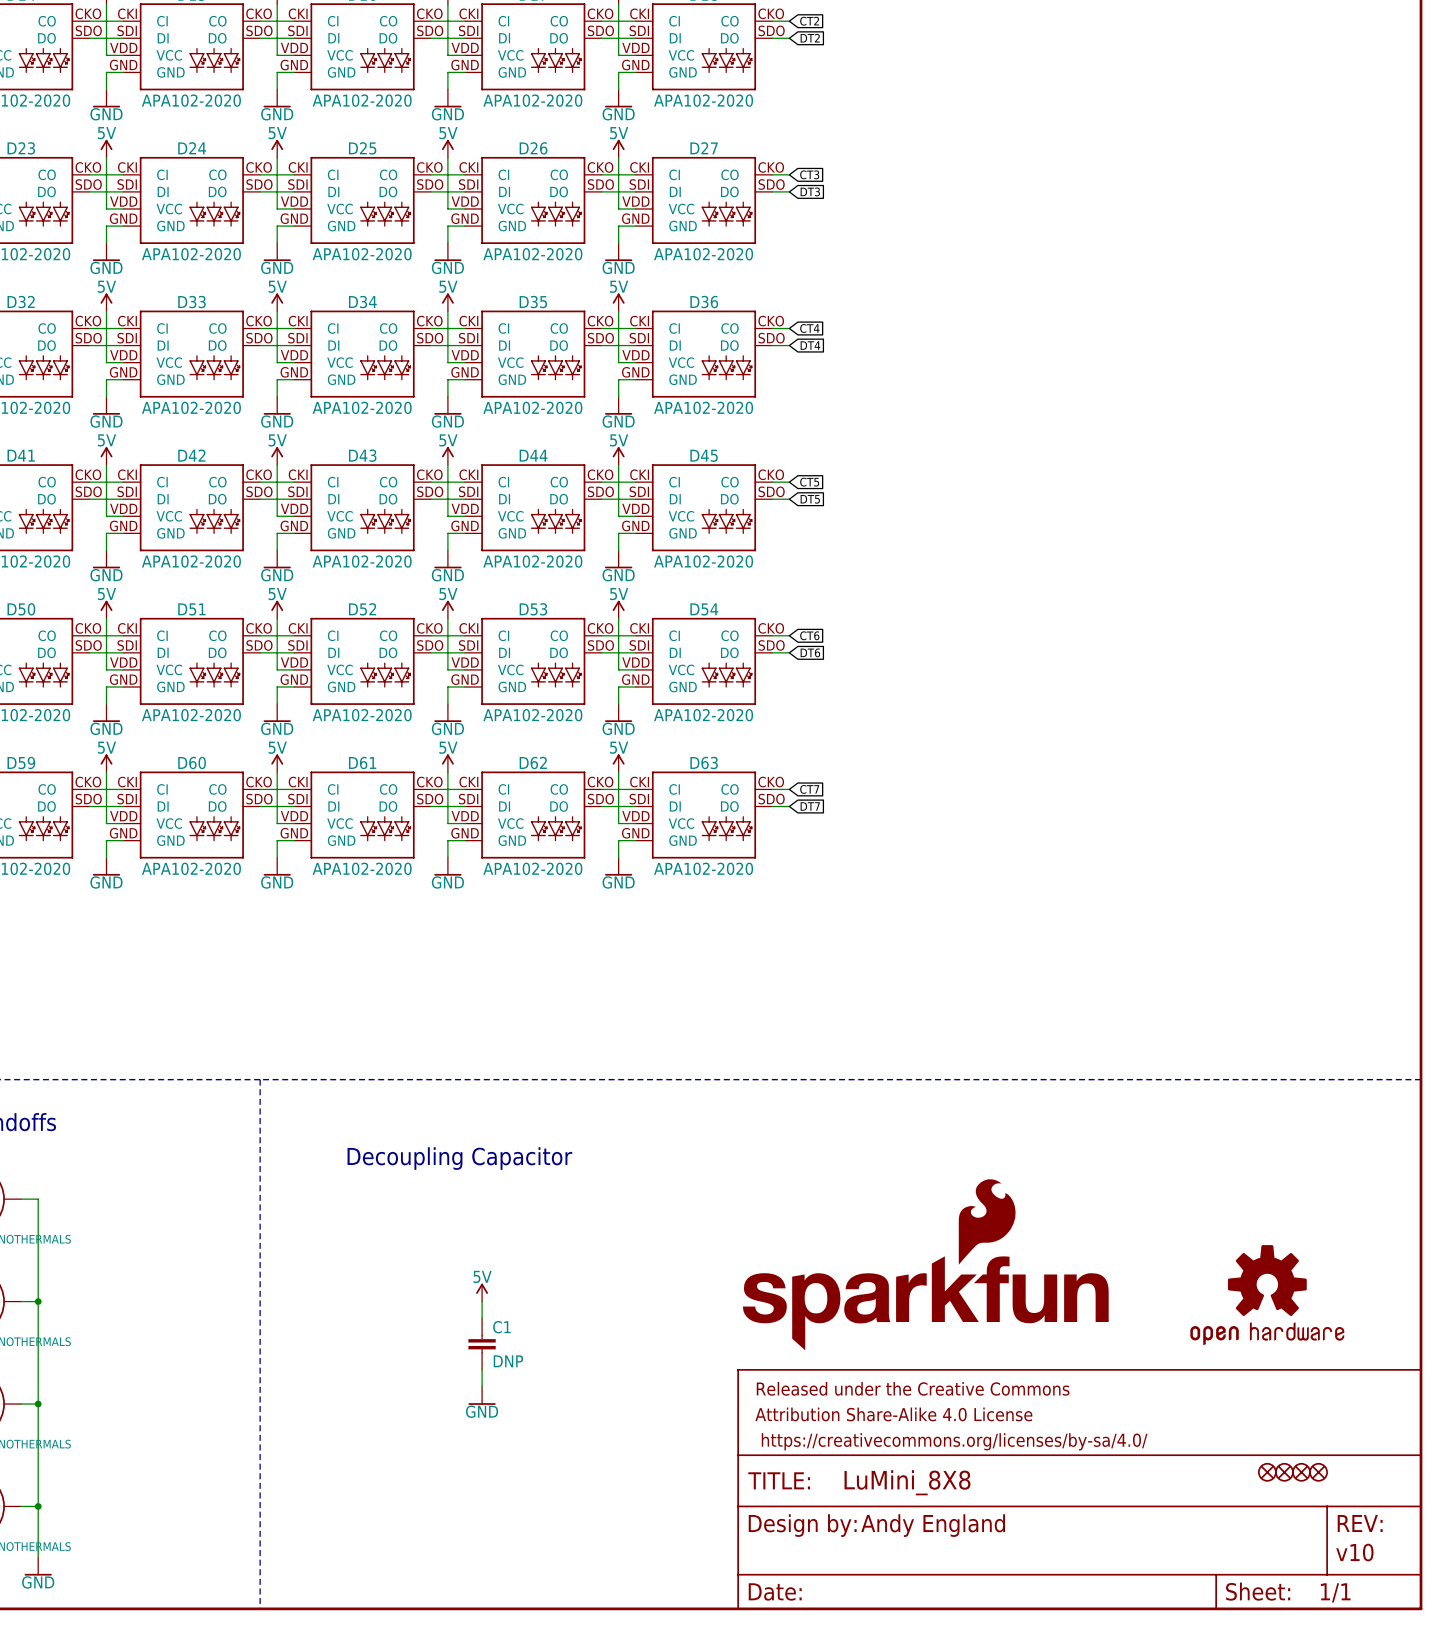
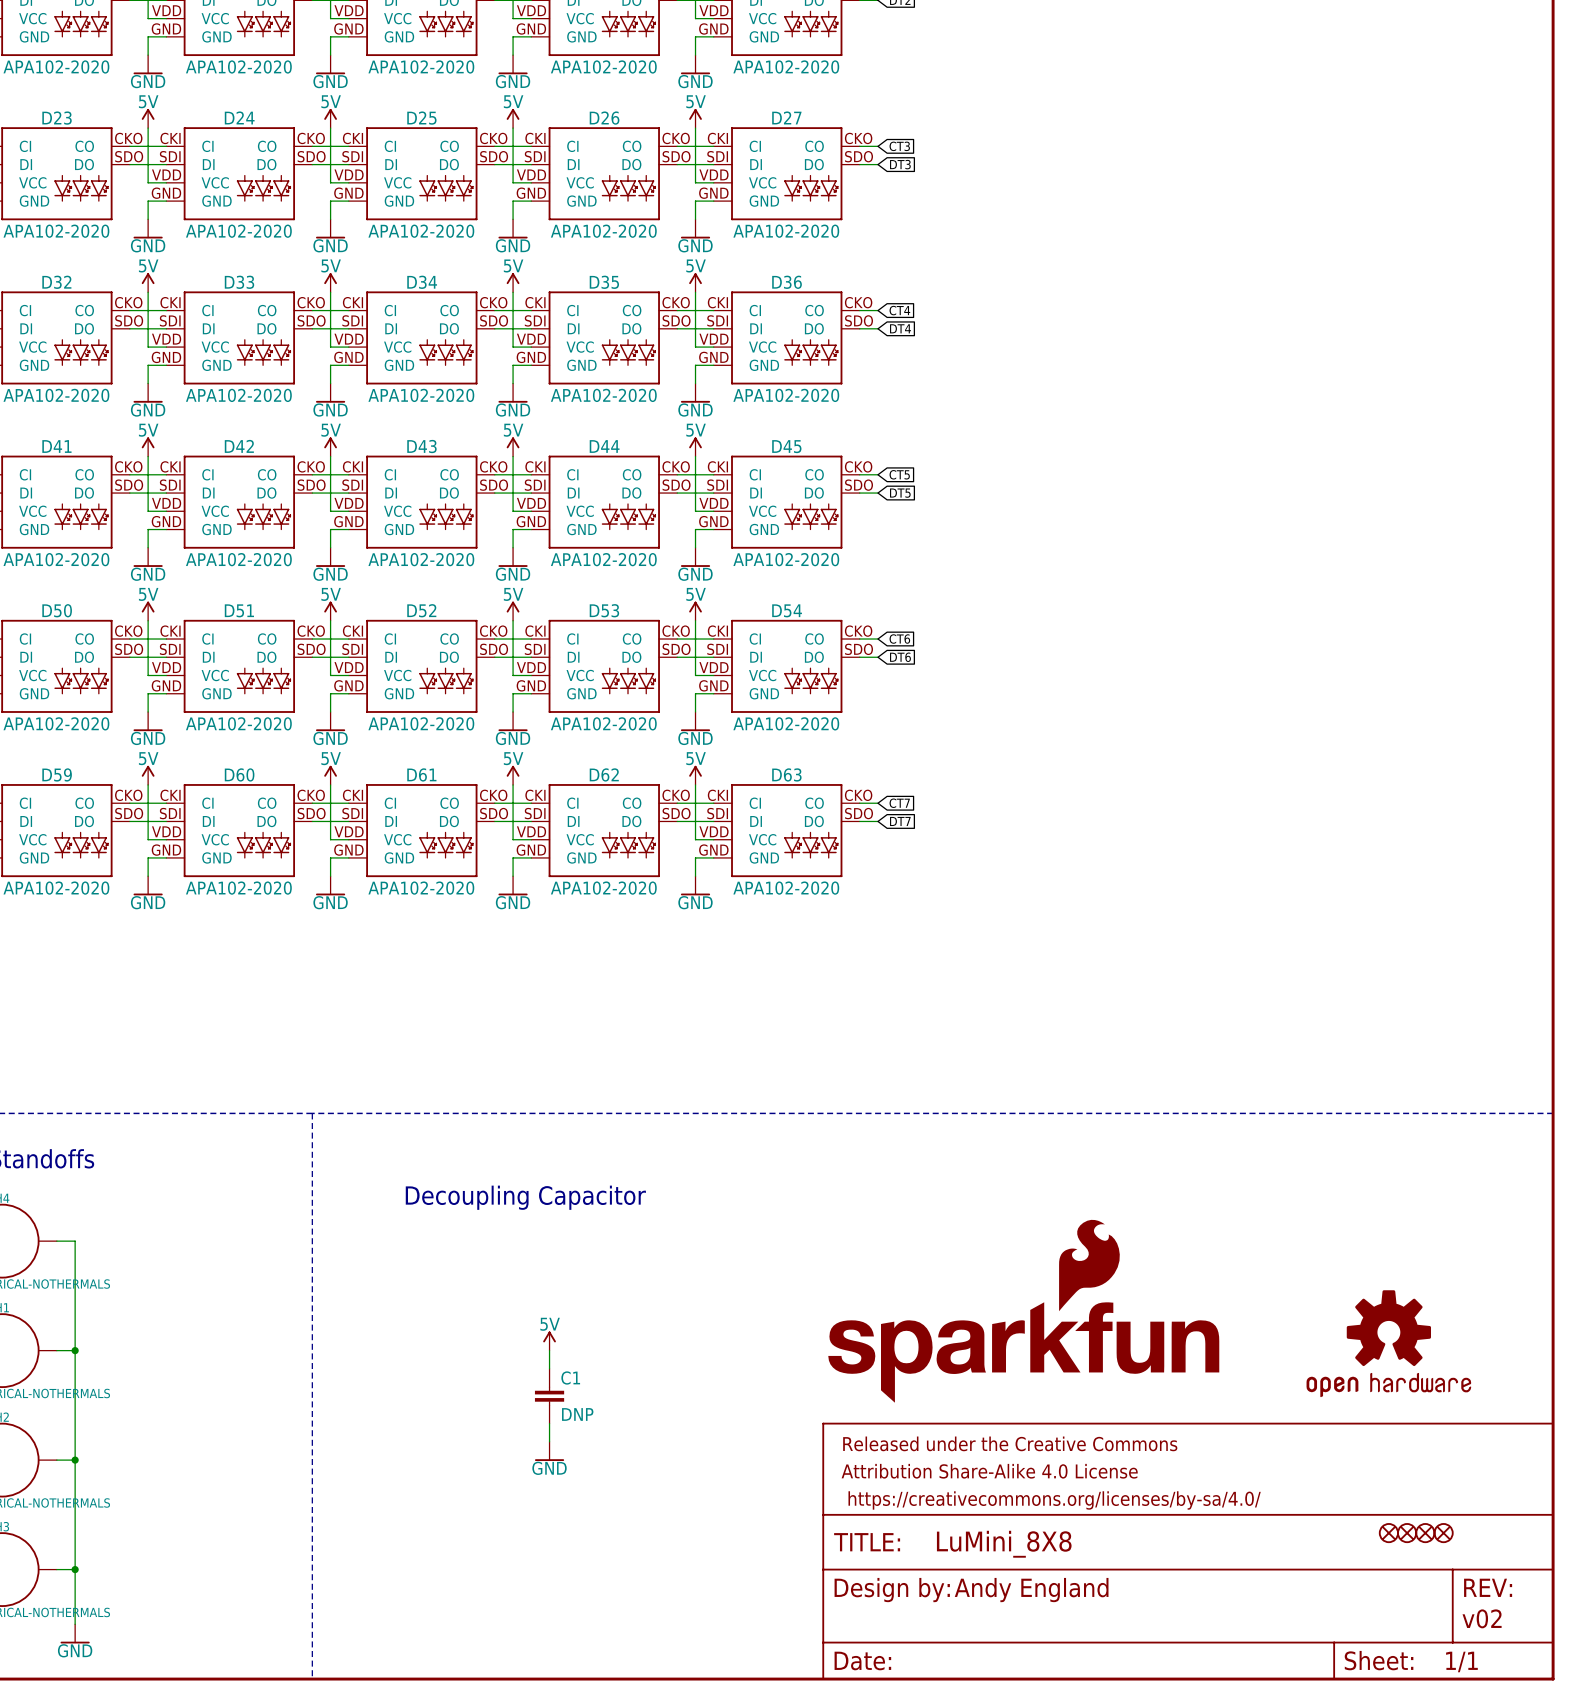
text: v10 (1354, 1552) -> v02 (1482, 1618)

